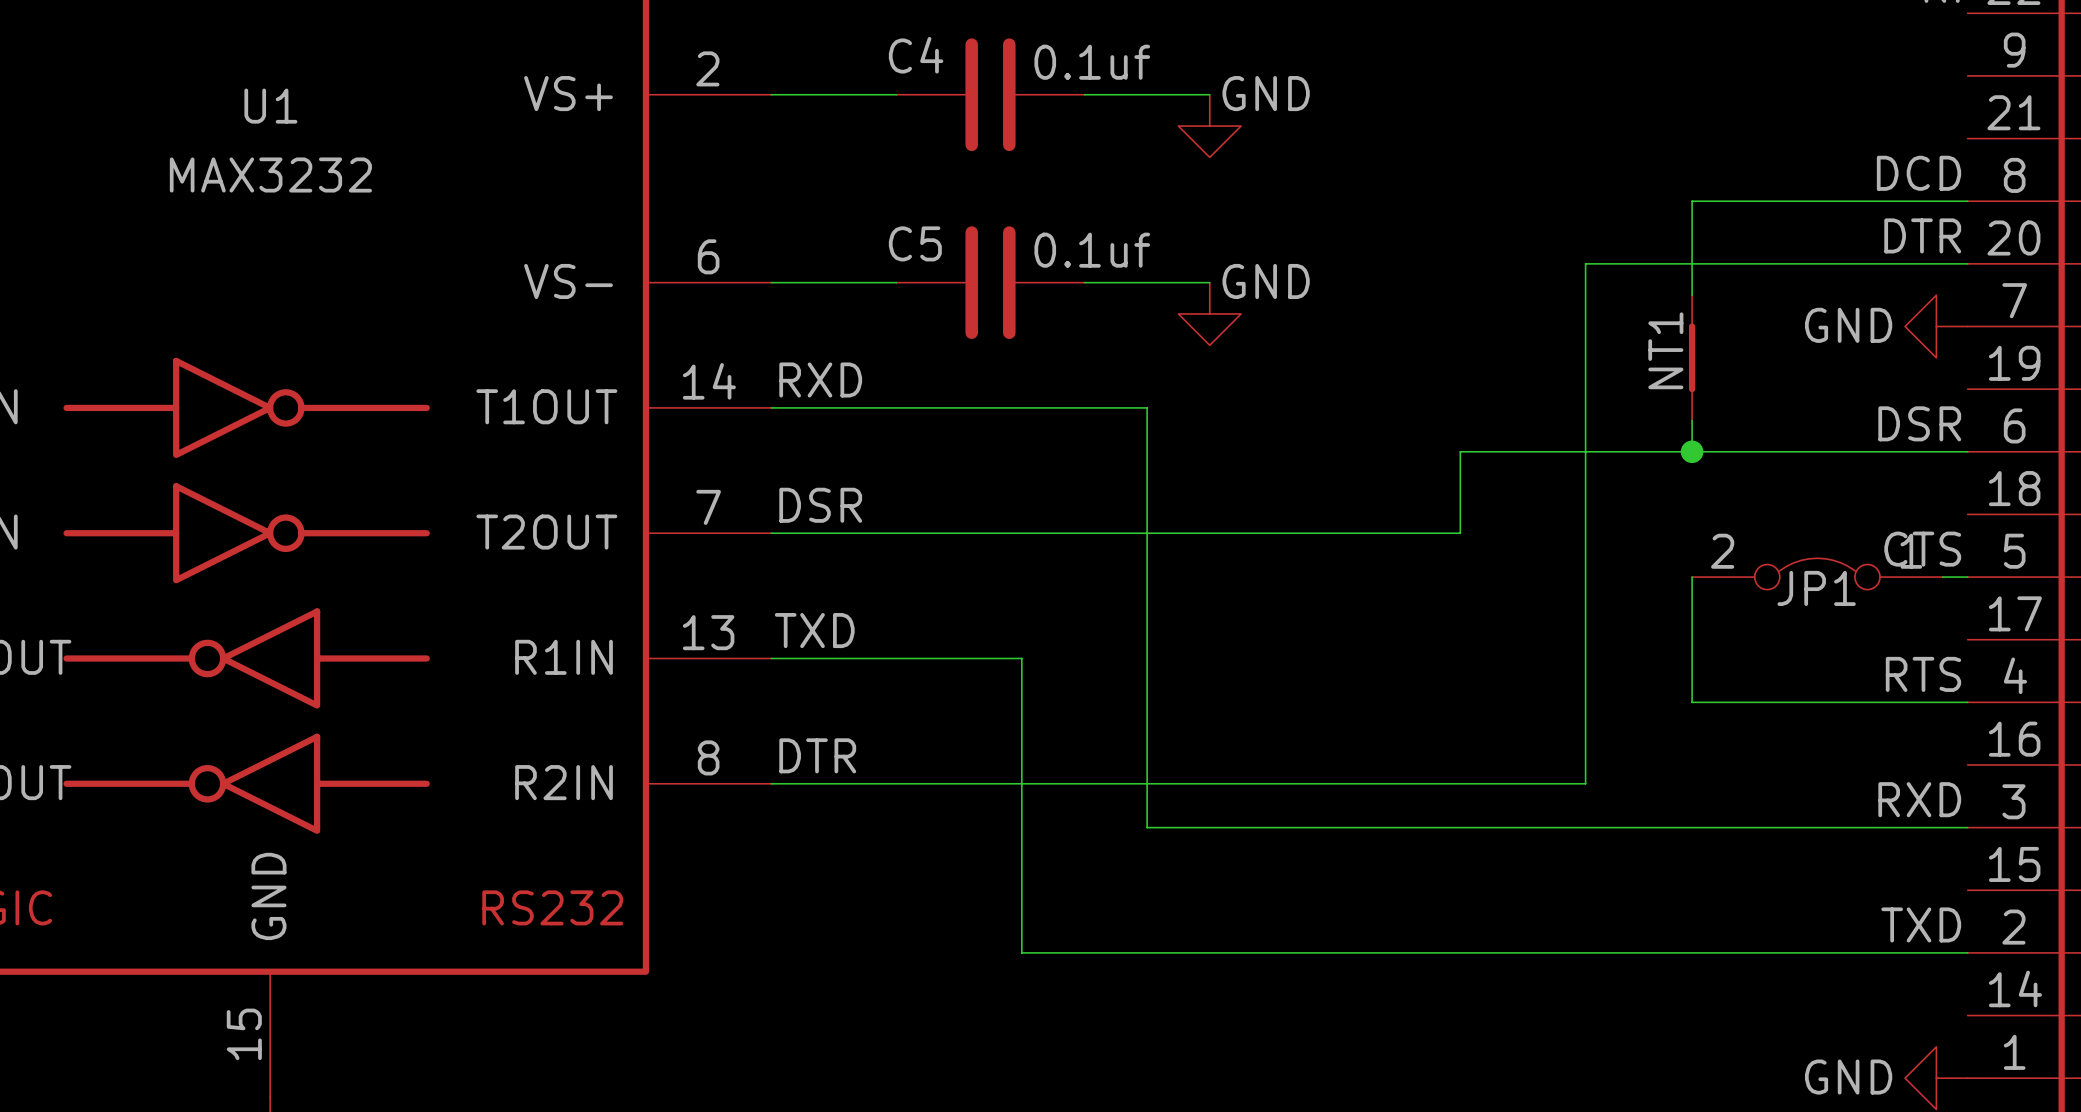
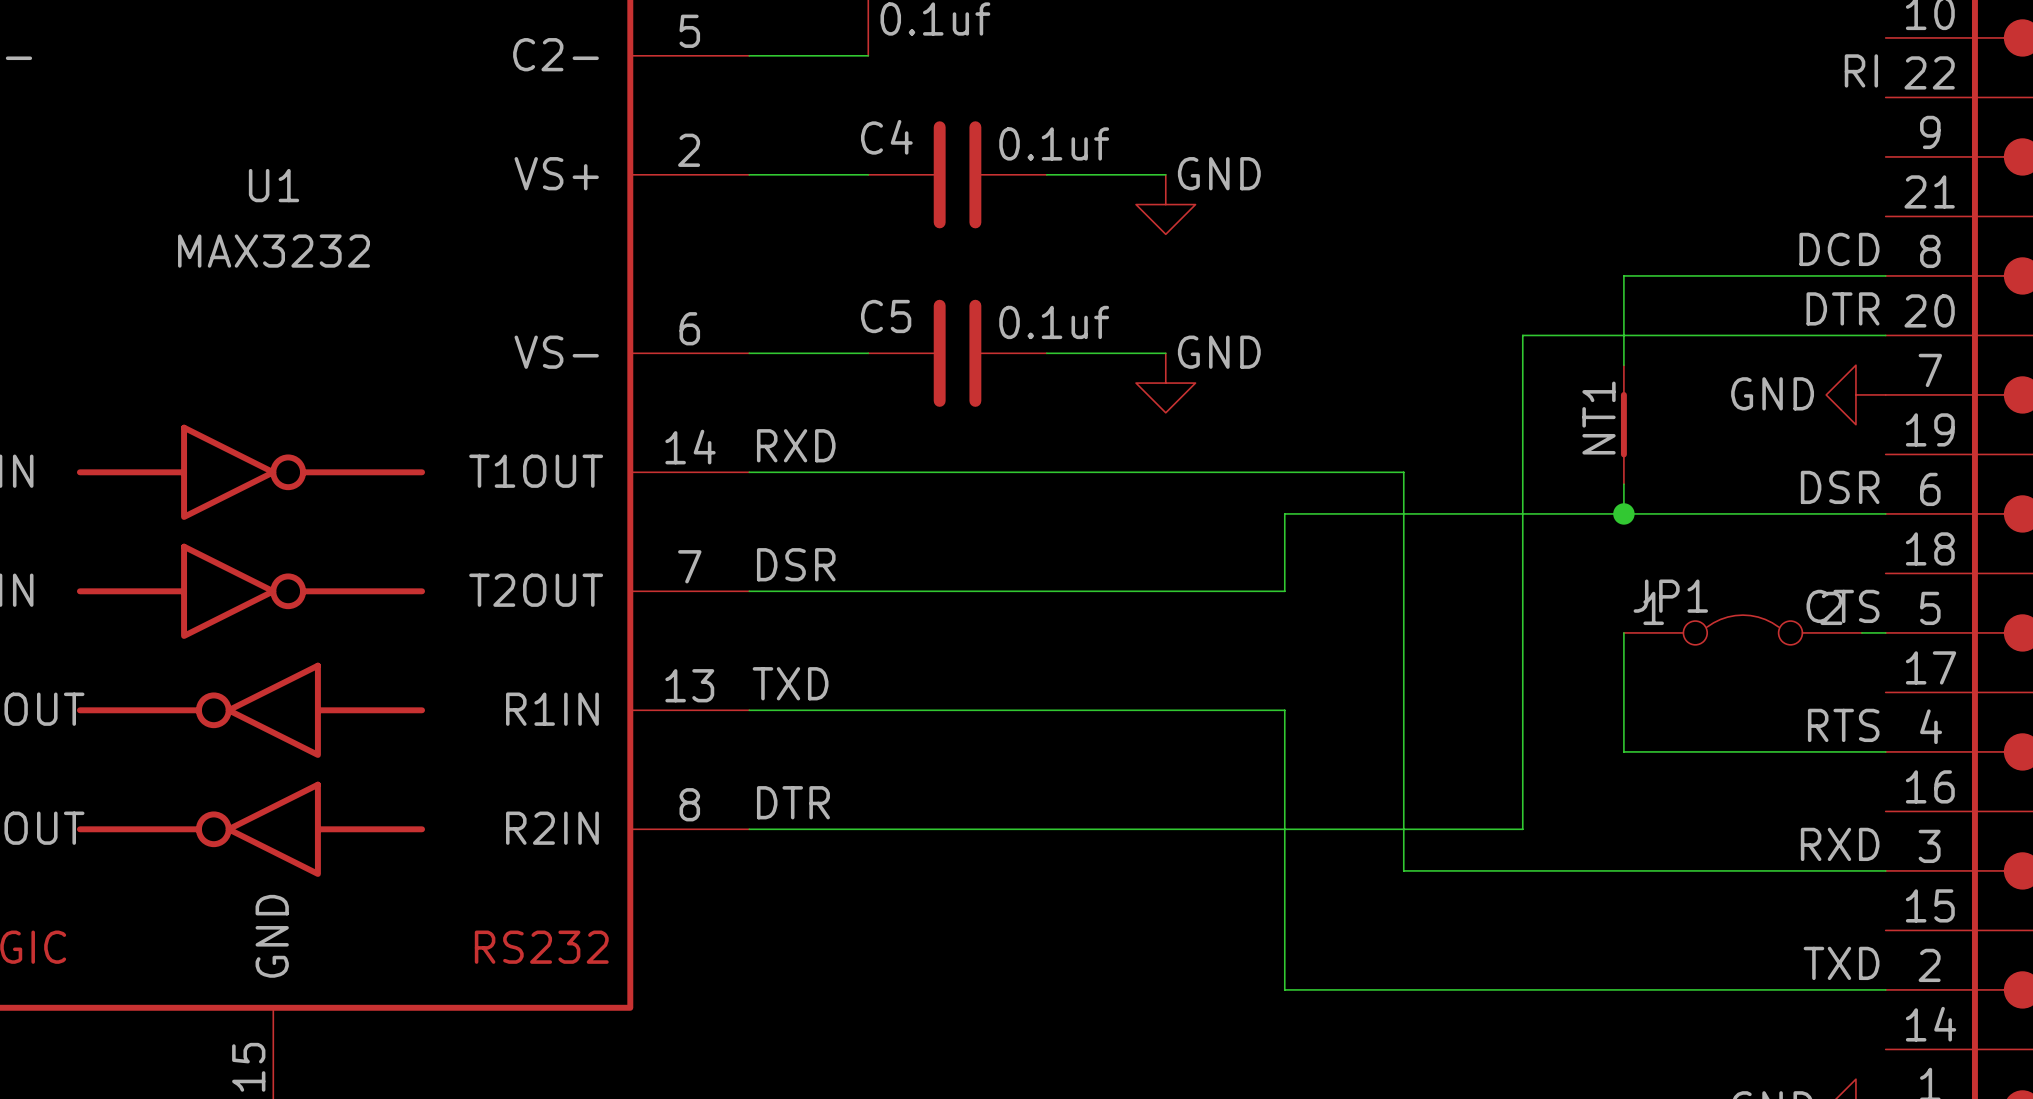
wire: (1147, 407) (1147, 827) (1460, 827) -> (1106, 472) (1403, 472) (1403, 513) (1284, 513) (1284, 591)
wire: (1335, 533) (1460, 533) -> (1403, 870) (1403, 591)
JP1 flip: as is (1817, 573) -> left-right (1742, 629)
JP1 name position: JP1 (1816, 588) -> JP1 (1670, 596)
wire: (1021, 658) (1021, 952) (1335, 952) -> (987, 710) (1284, 710) (1284, 989)

